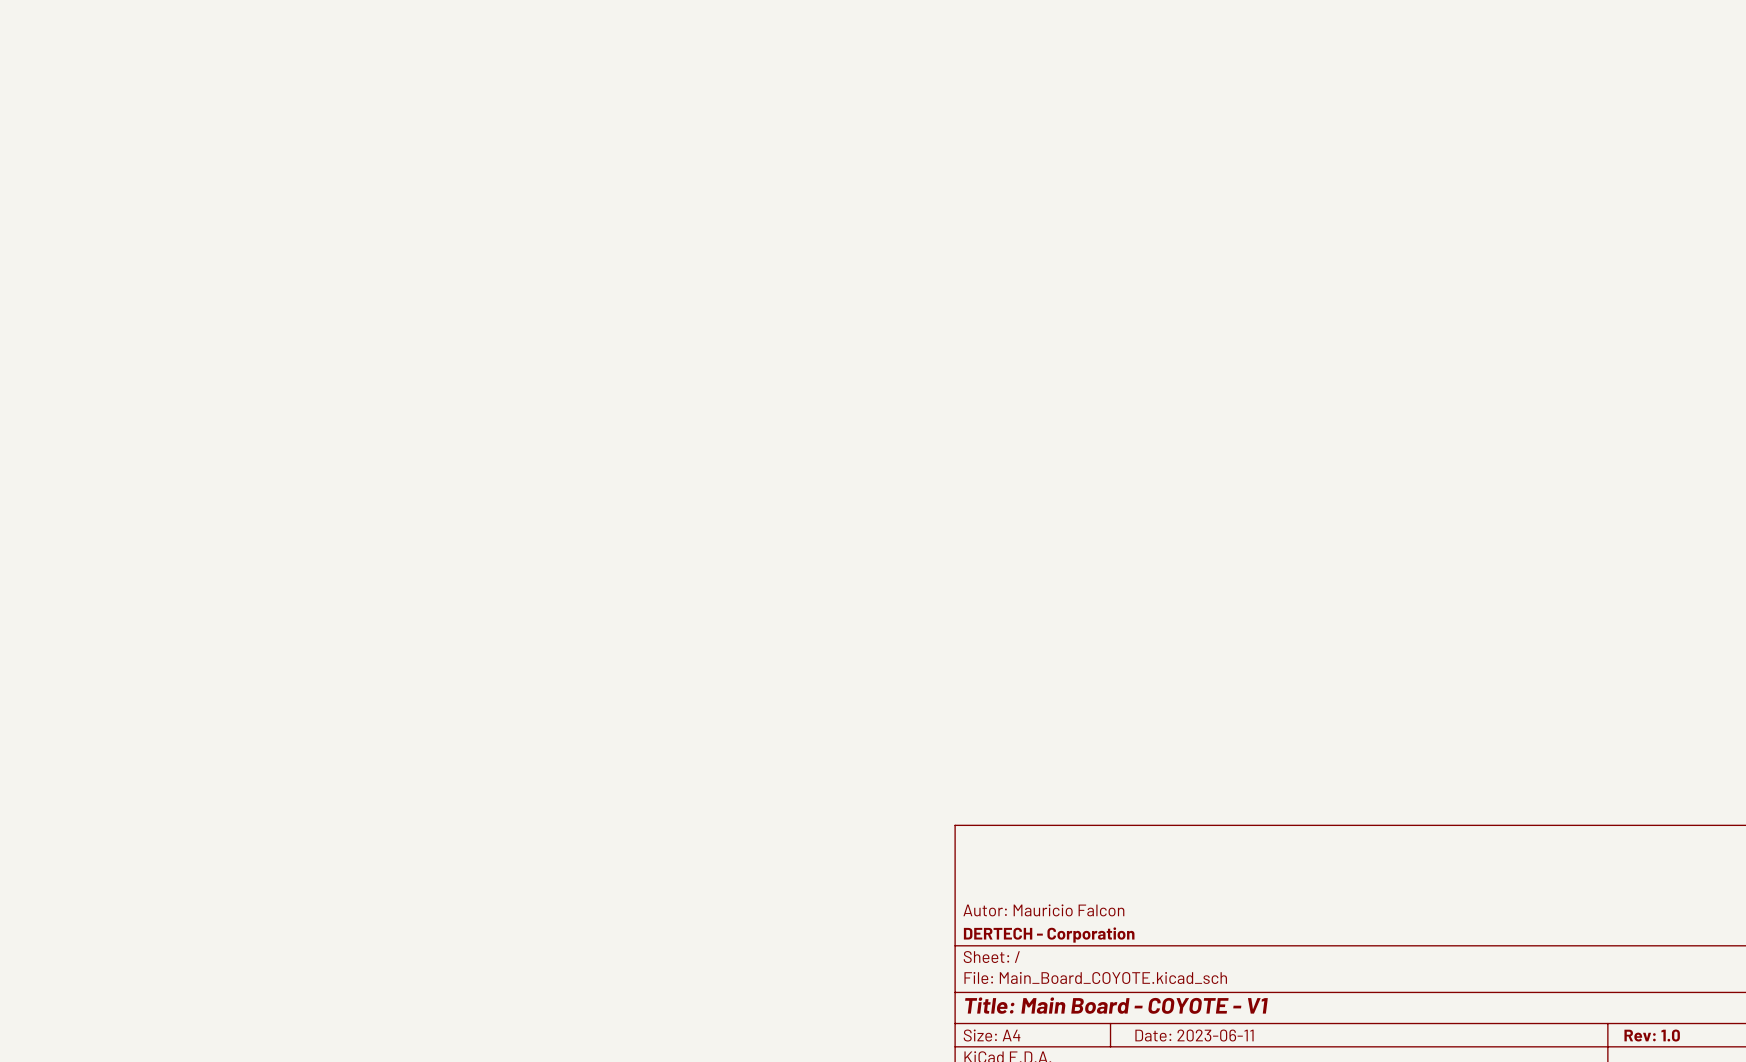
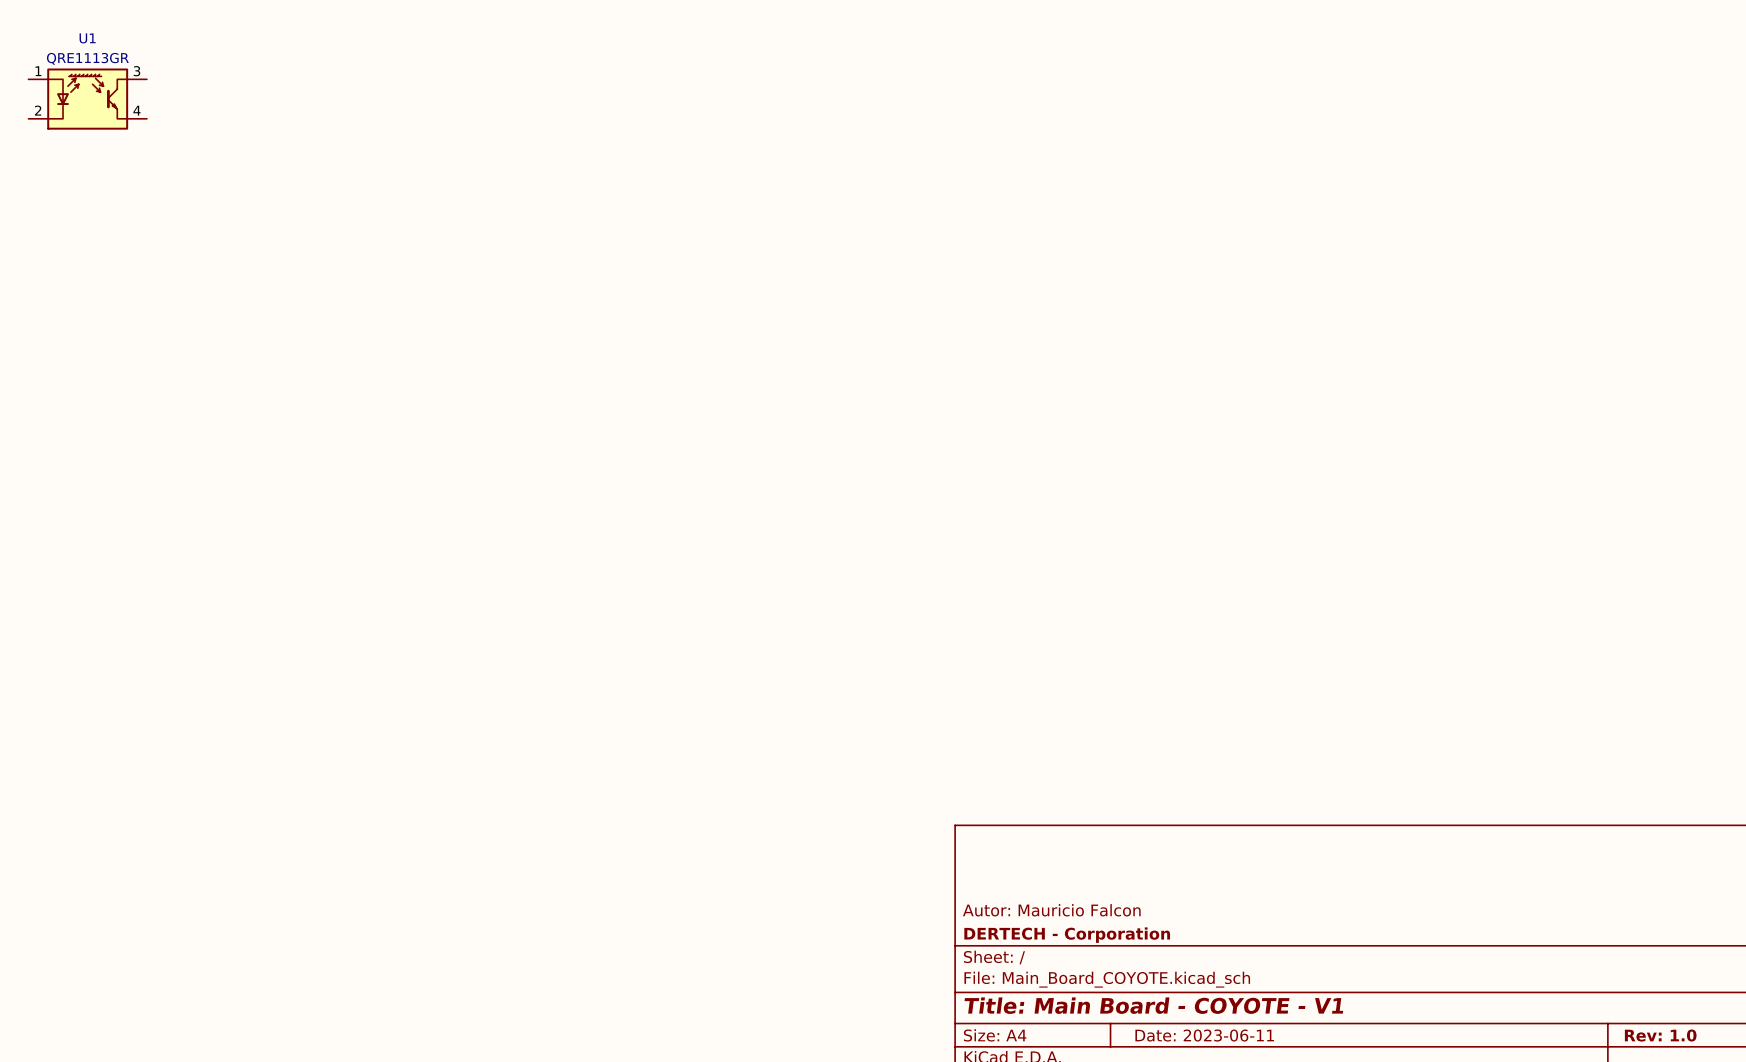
U1: none -> QRE1113GR (87, 99)

